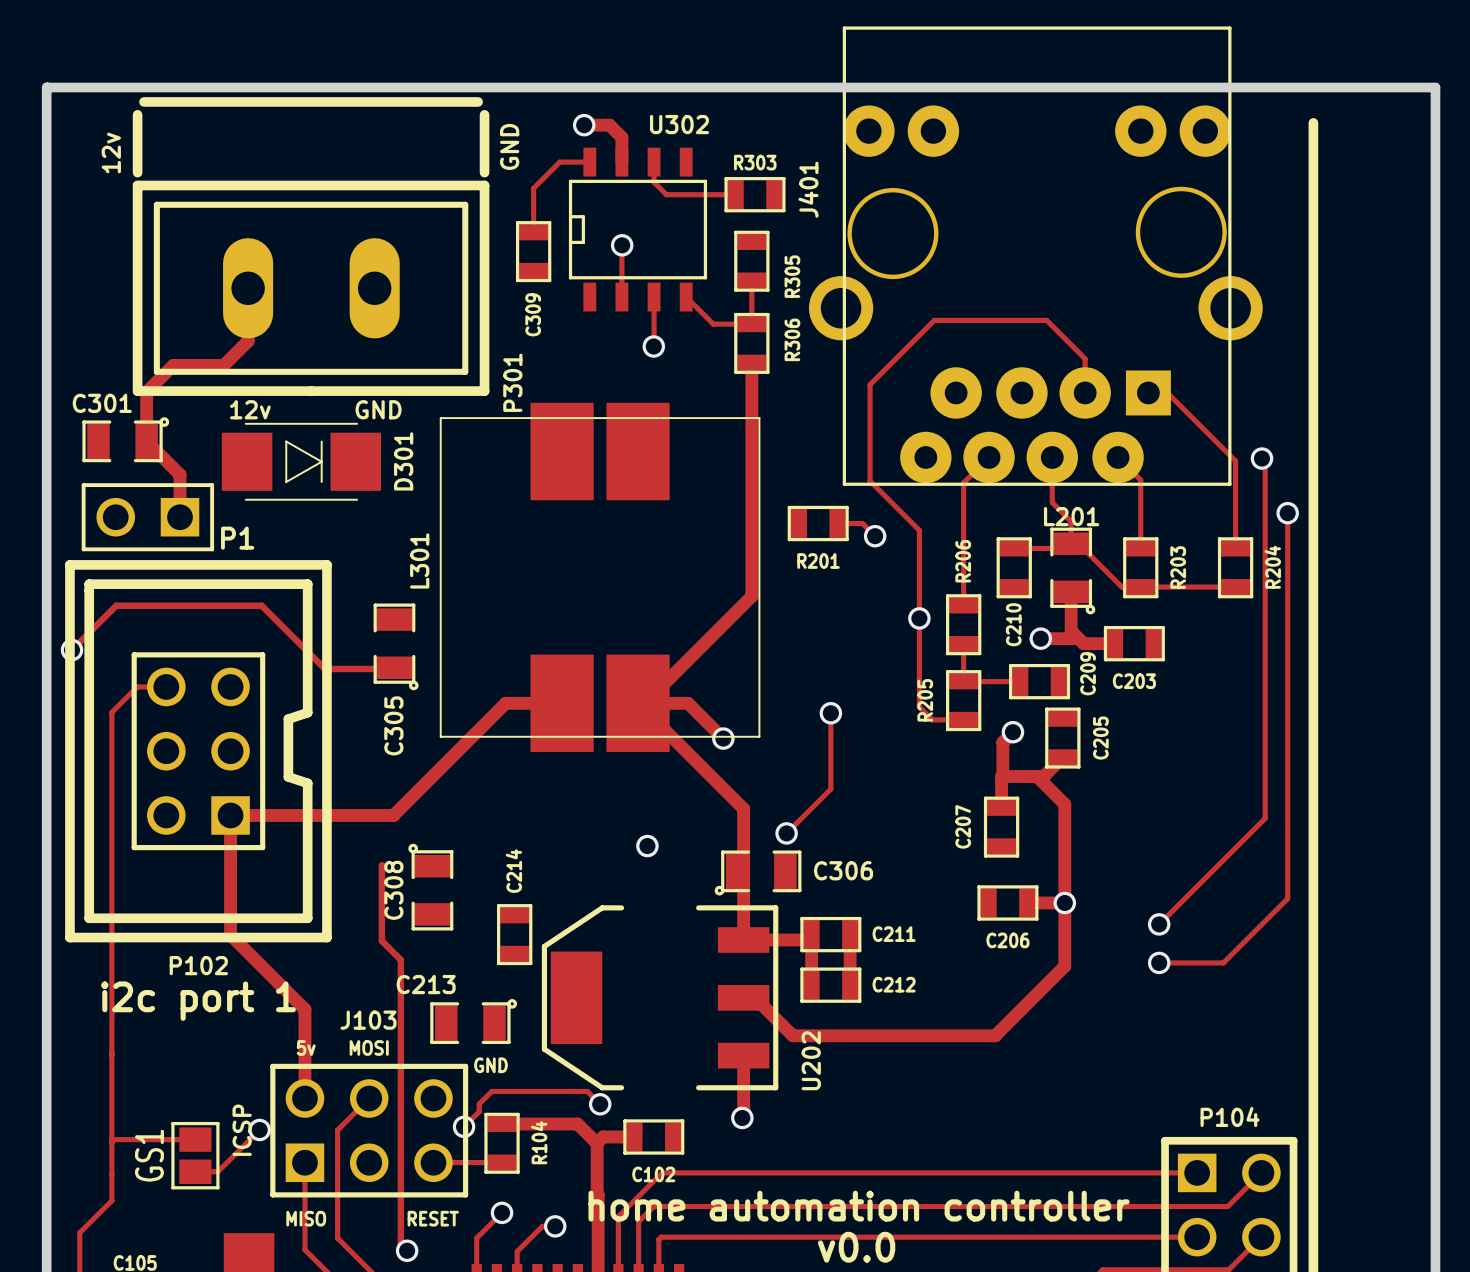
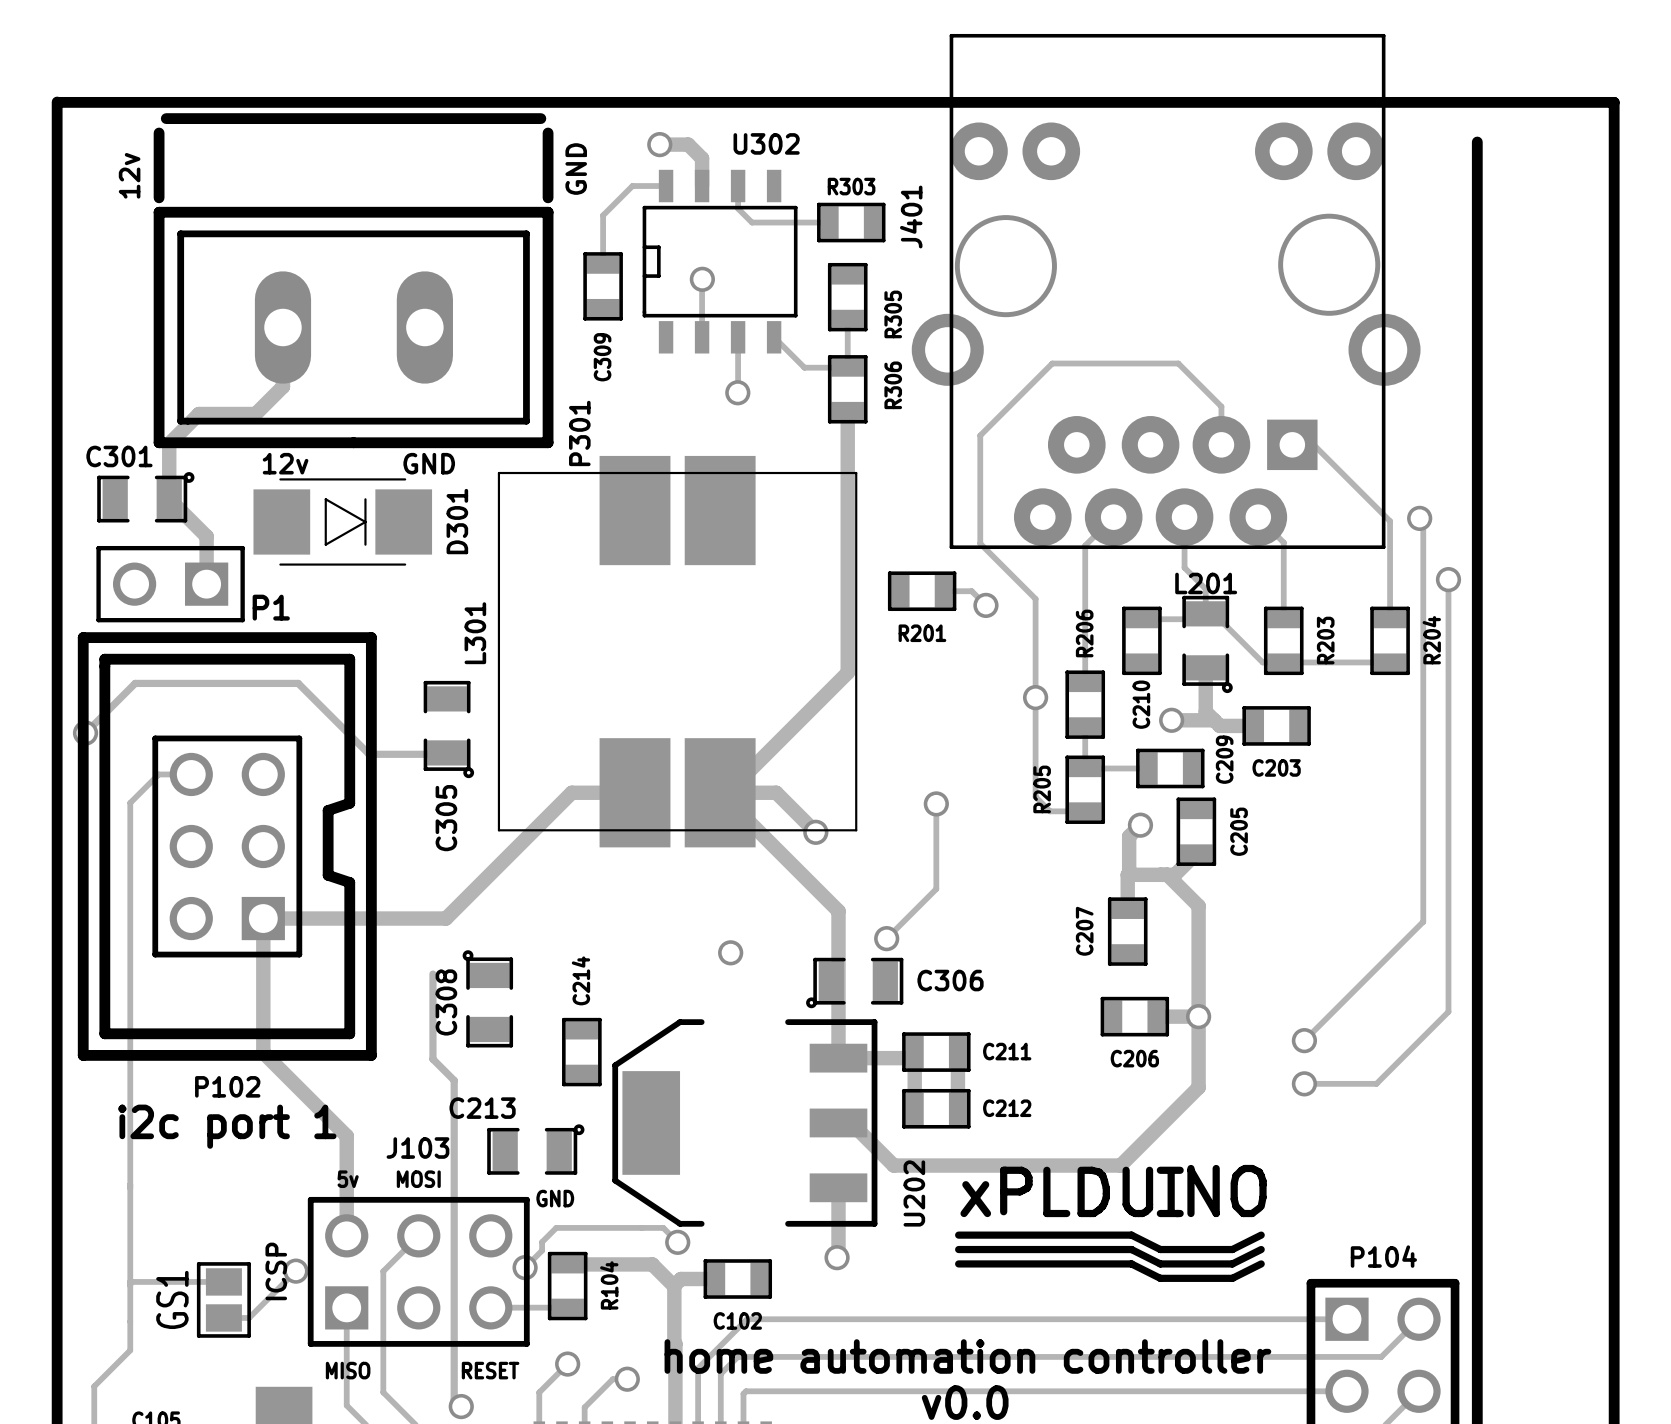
drawing: none -> [955, 1164, 1267, 1282]

